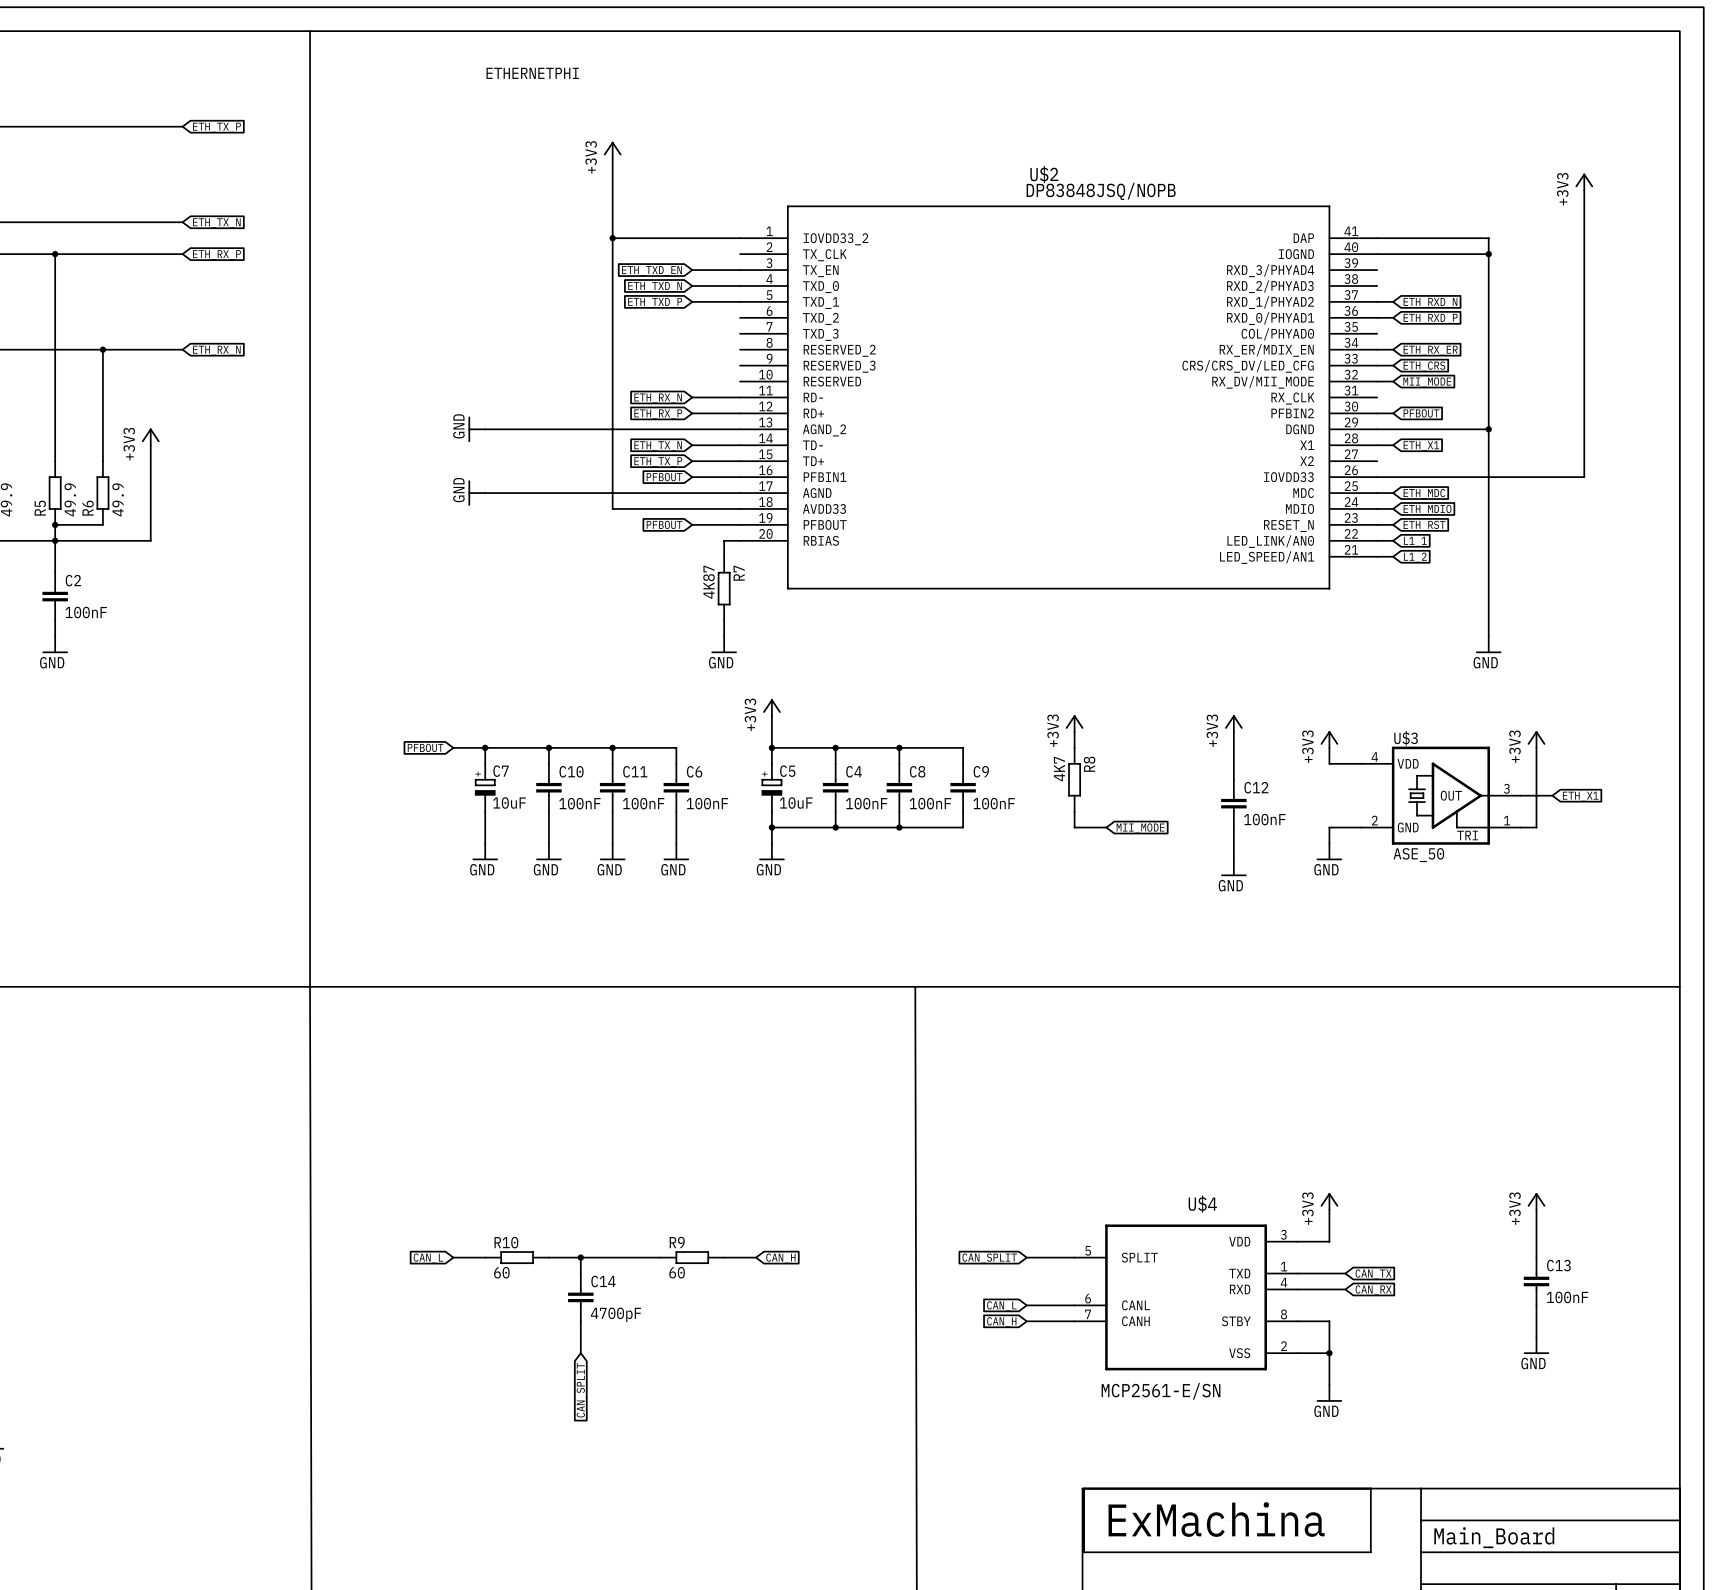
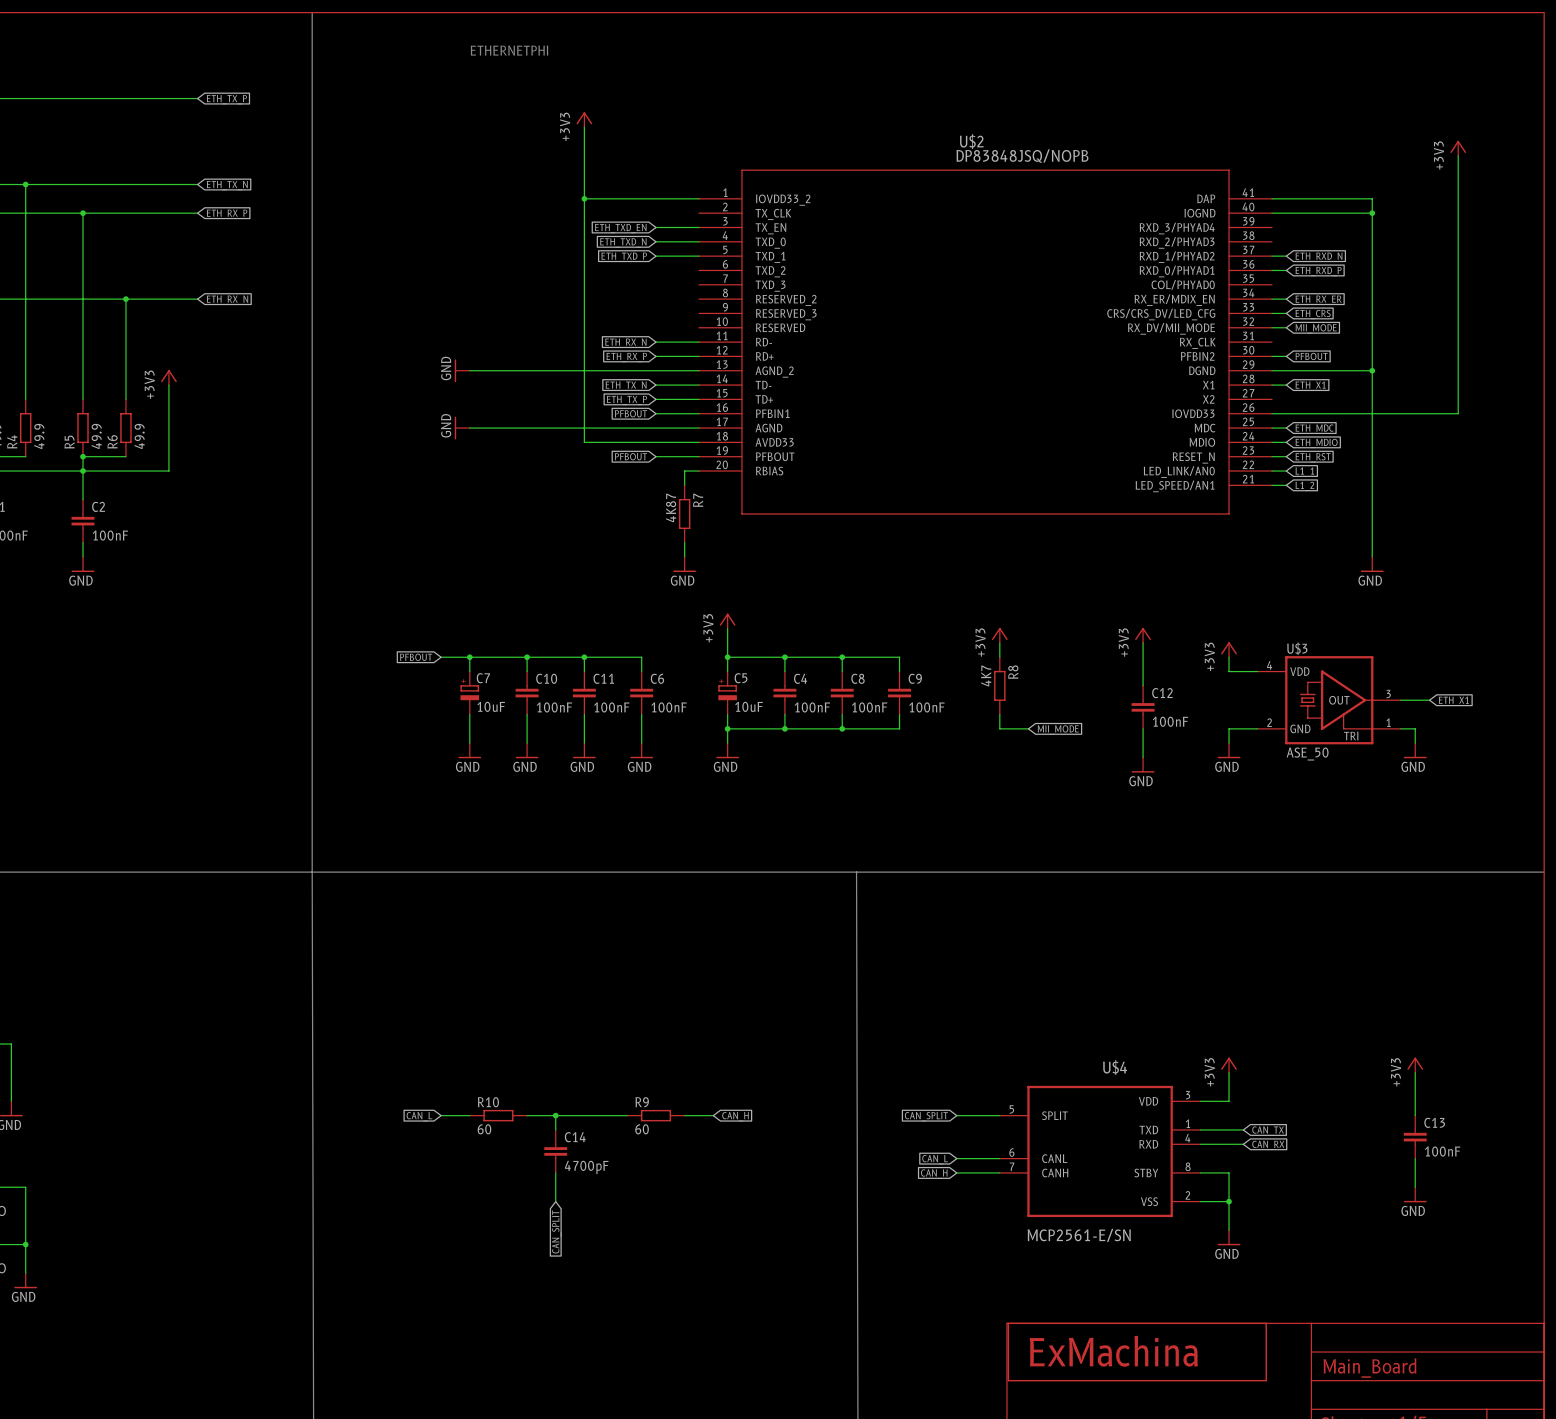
power symbol: +3V3 (1536, 739) -> none
wire: (1536, 747) (1536, 827) -> (1415, 743) (1415, 728)
power symbol: none -> GND (1415, 750)

